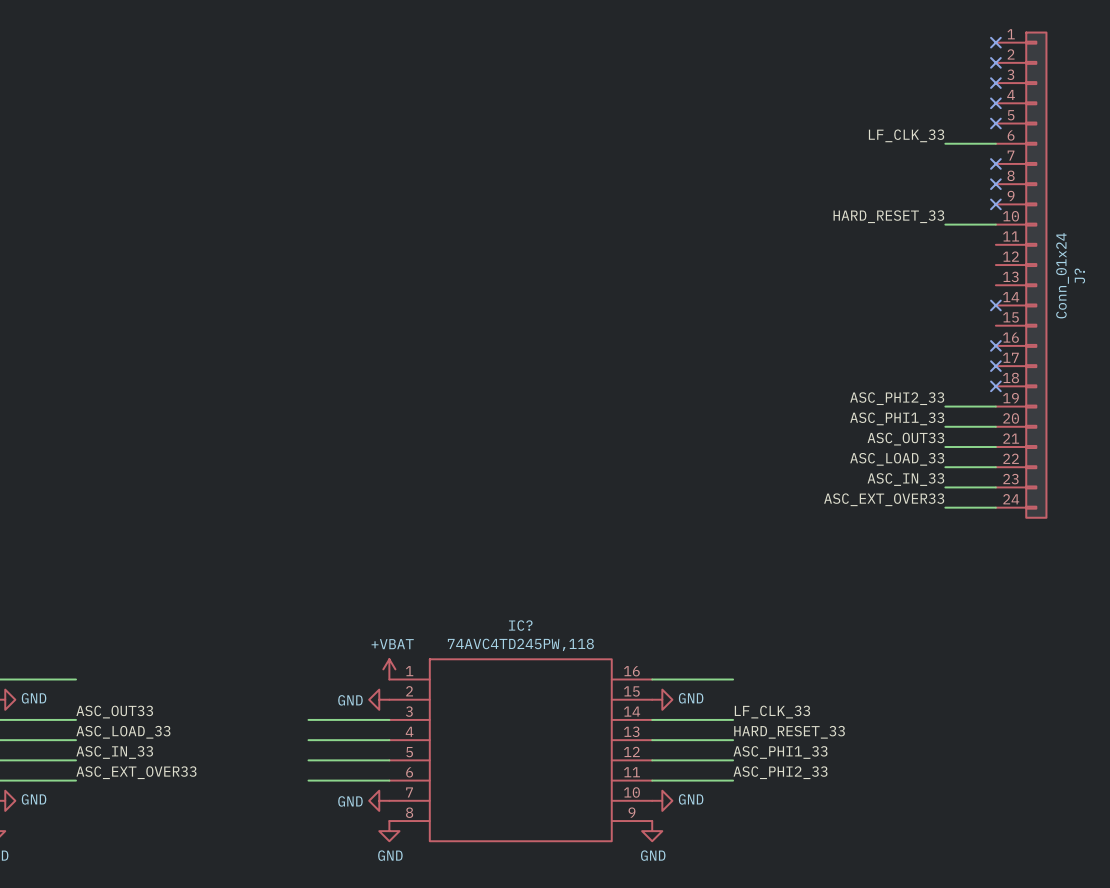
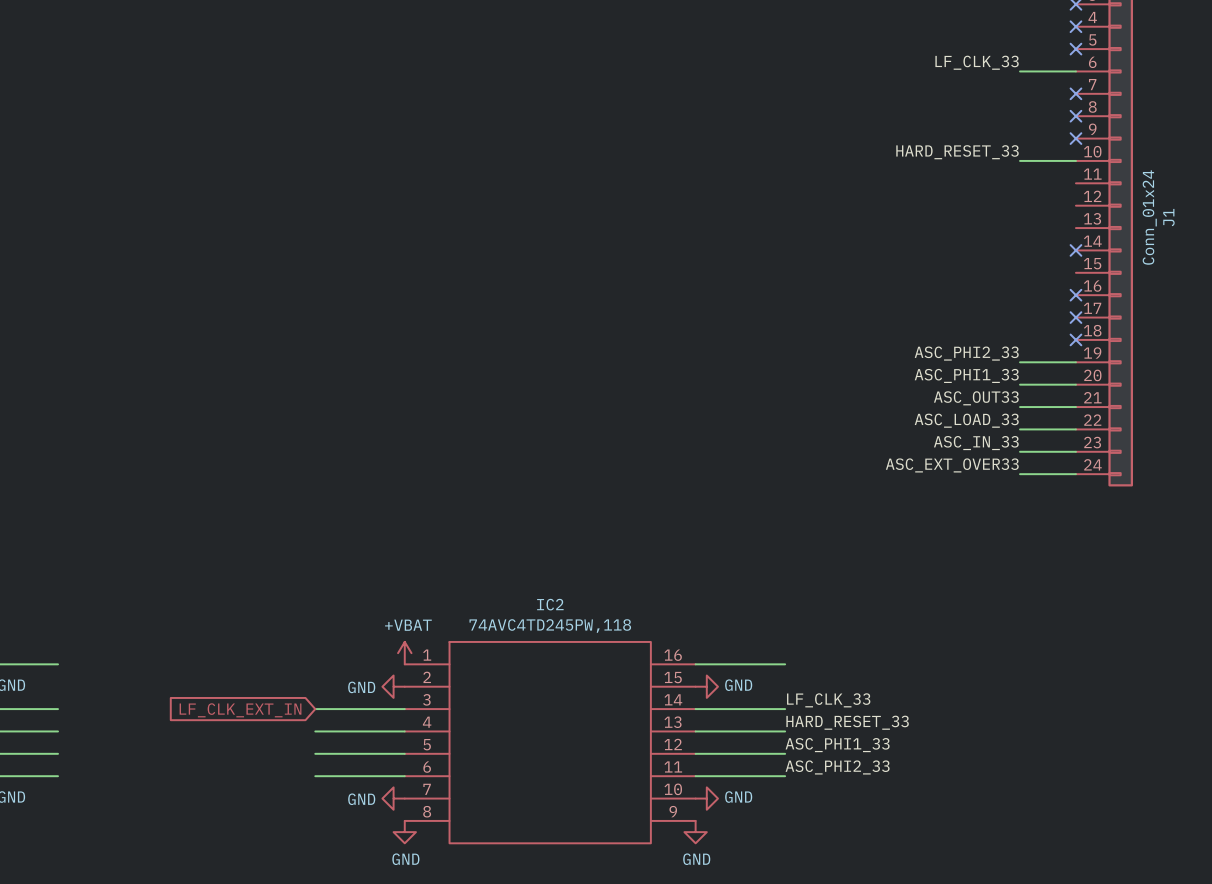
J? name: J? (1079, 276) -> J1 (1168, 217)
IC? name: IC? (520, 625) -> IC2 (550, 604)
label: ASC_OUT33 (114, 712) -> none
global label: none -> LF_CLK_EXT_IN (240, 710)
label: ASC_LOAD_33 (123, 732) -> none
label: ASC_IN_33 (114, 752) -> none
label: ASC_EXT_OVER33 (136, 772) -> none

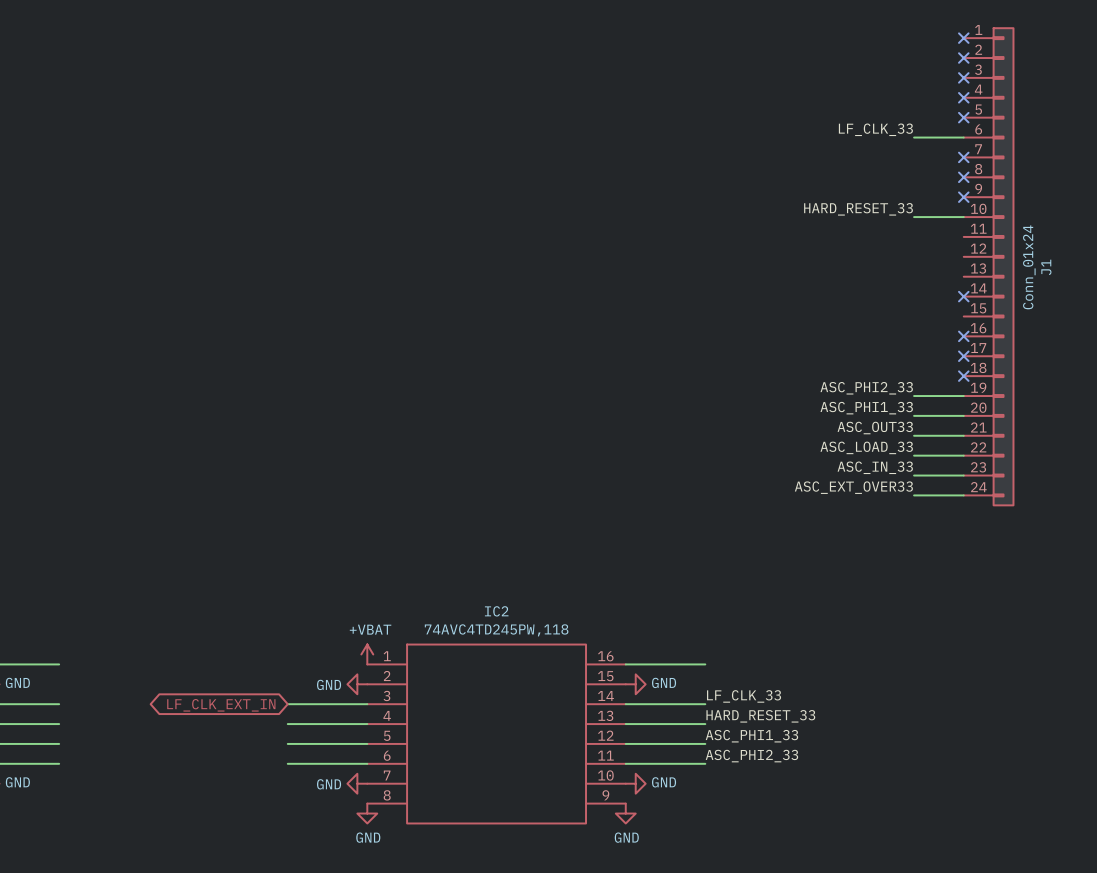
global label shape: input (240, 710) -> bidirectional (221, 705)

